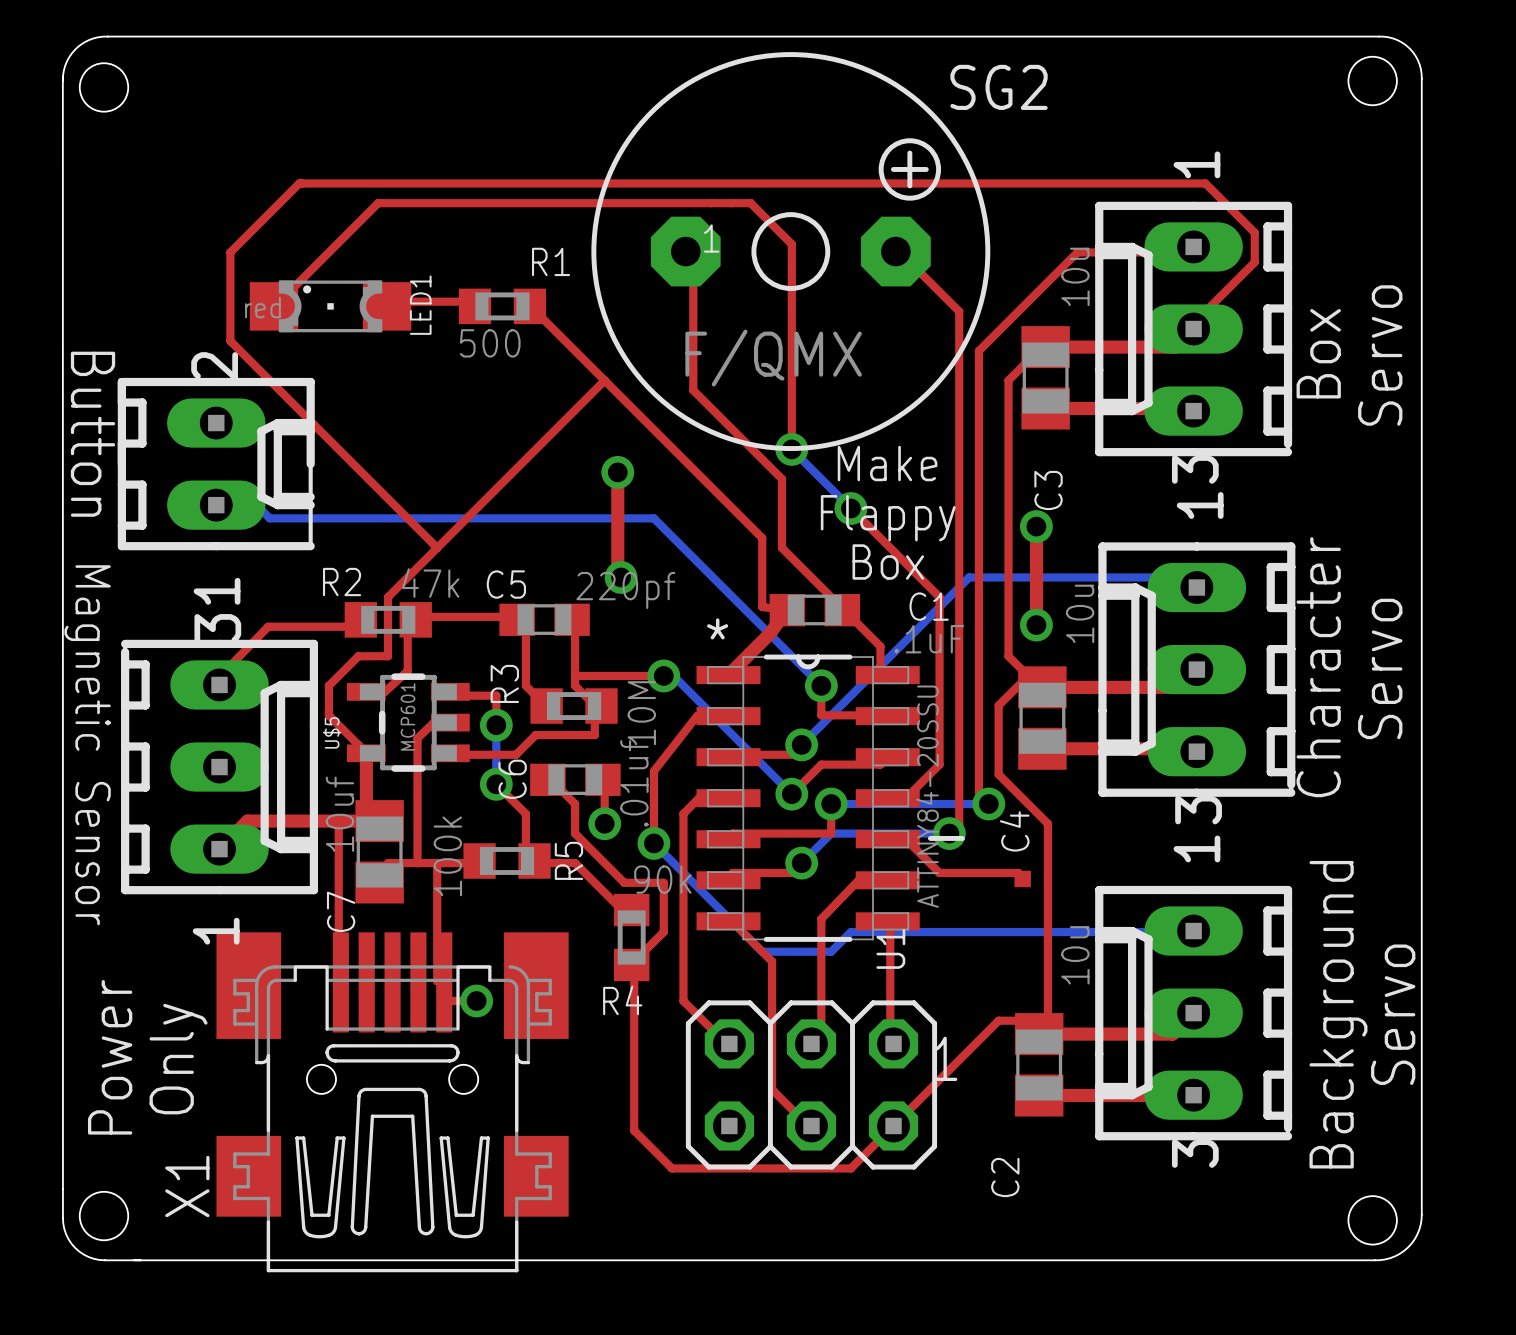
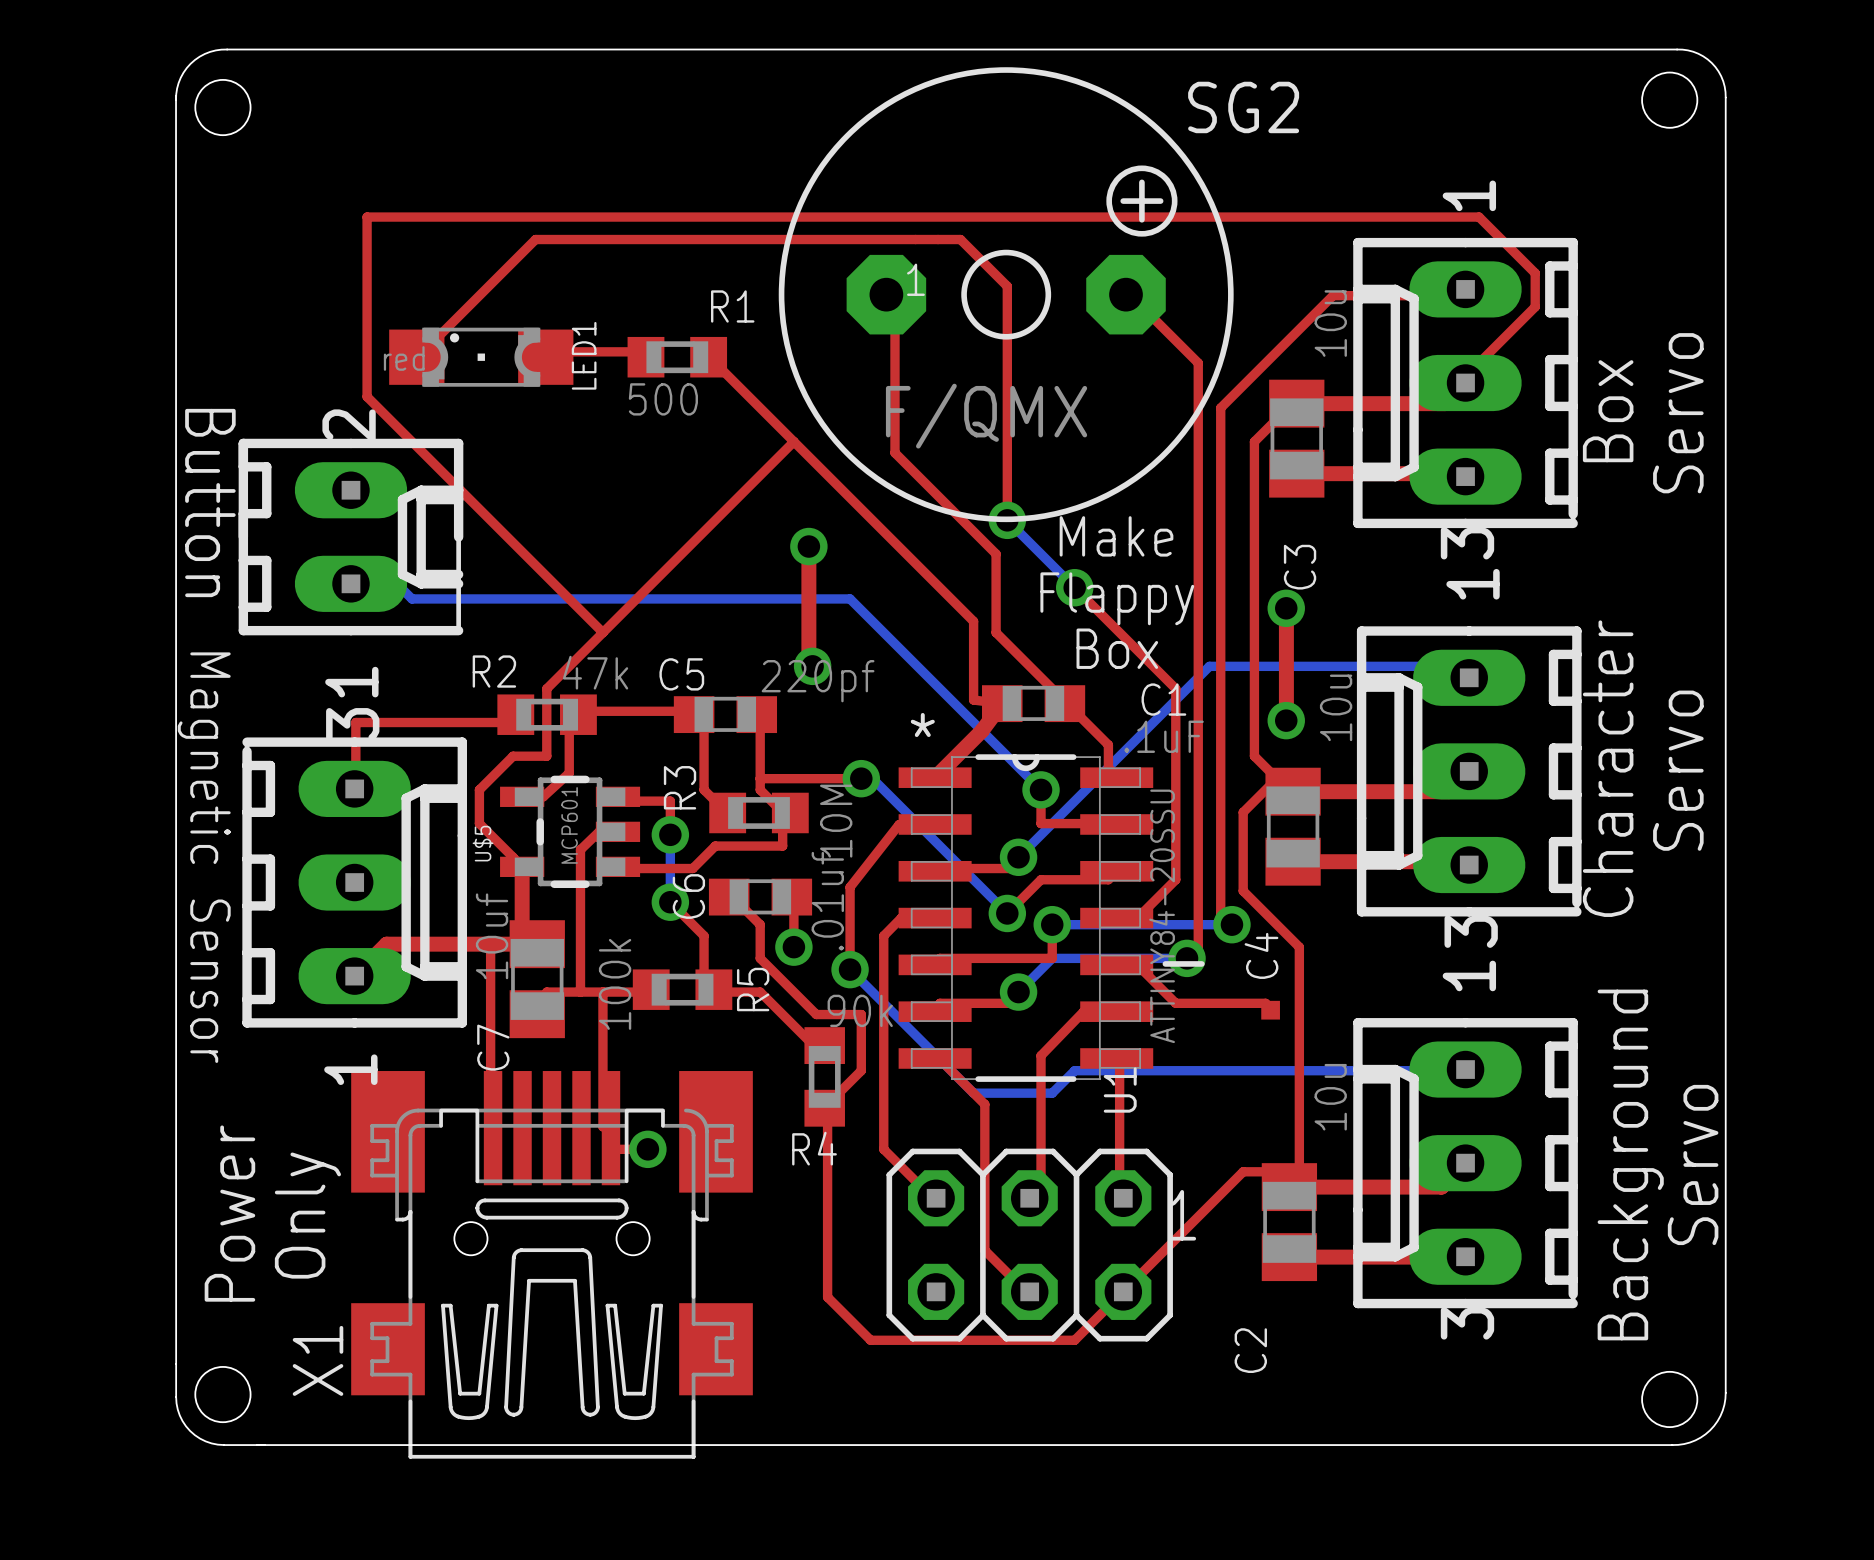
top track: (299, 183) (230, 252) -> (445, 217) (367, 217) (367, 295)
top track: (268, 626) (220, 675) -> (410, 722) (355, 722) (355, 778)

